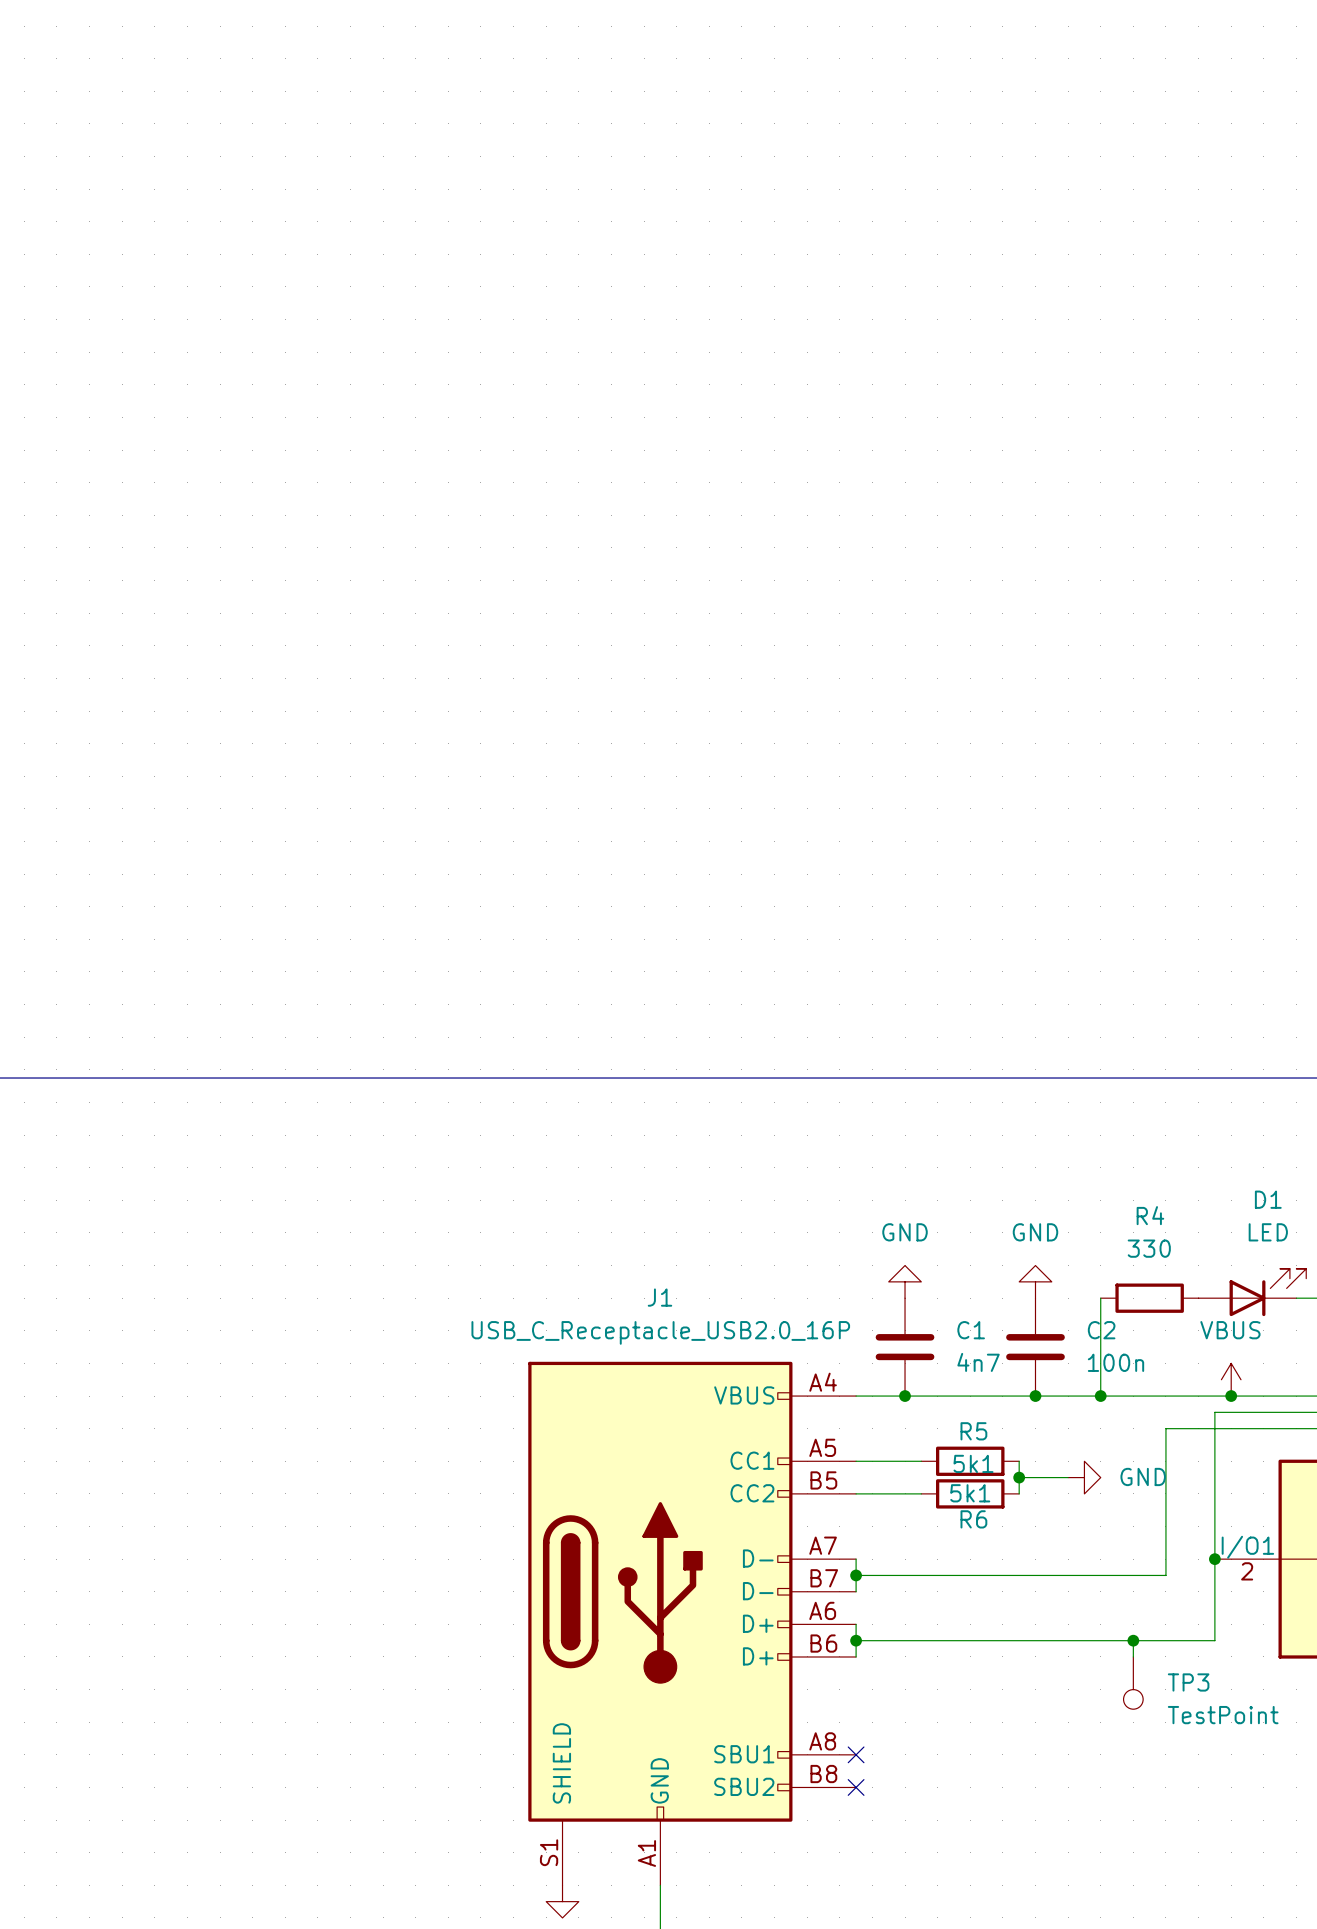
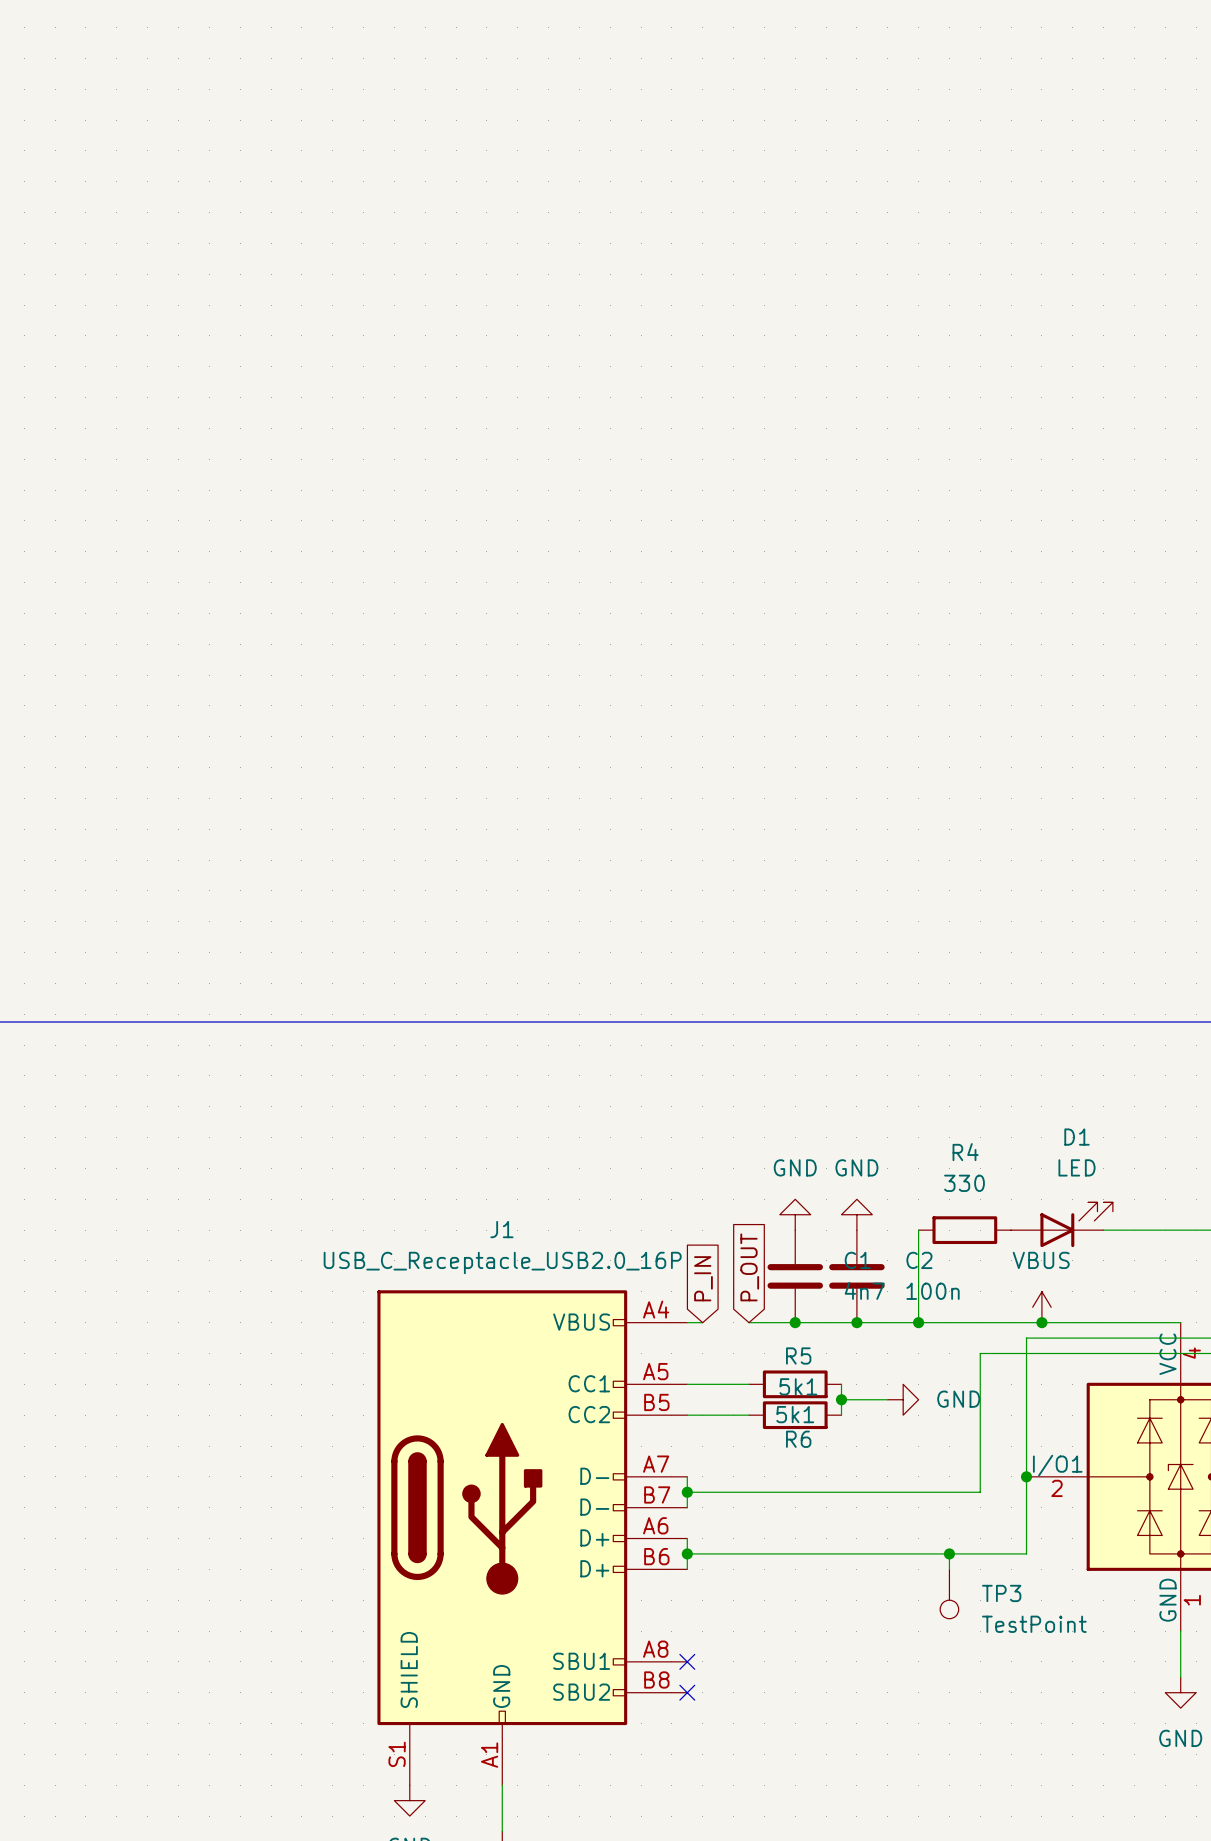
power symbol position: GND (905, 1281) -> GND (795, 1214)
global label: none -> P_OUT (749, 1267)
C1 position: (905, 1347) -> (795, 1276)
global label: none -> P_IN (703, 1278)
wire: (872, 1396) (921, 1396) -> none
junction position: (905, 1396) -> (795, 1322)

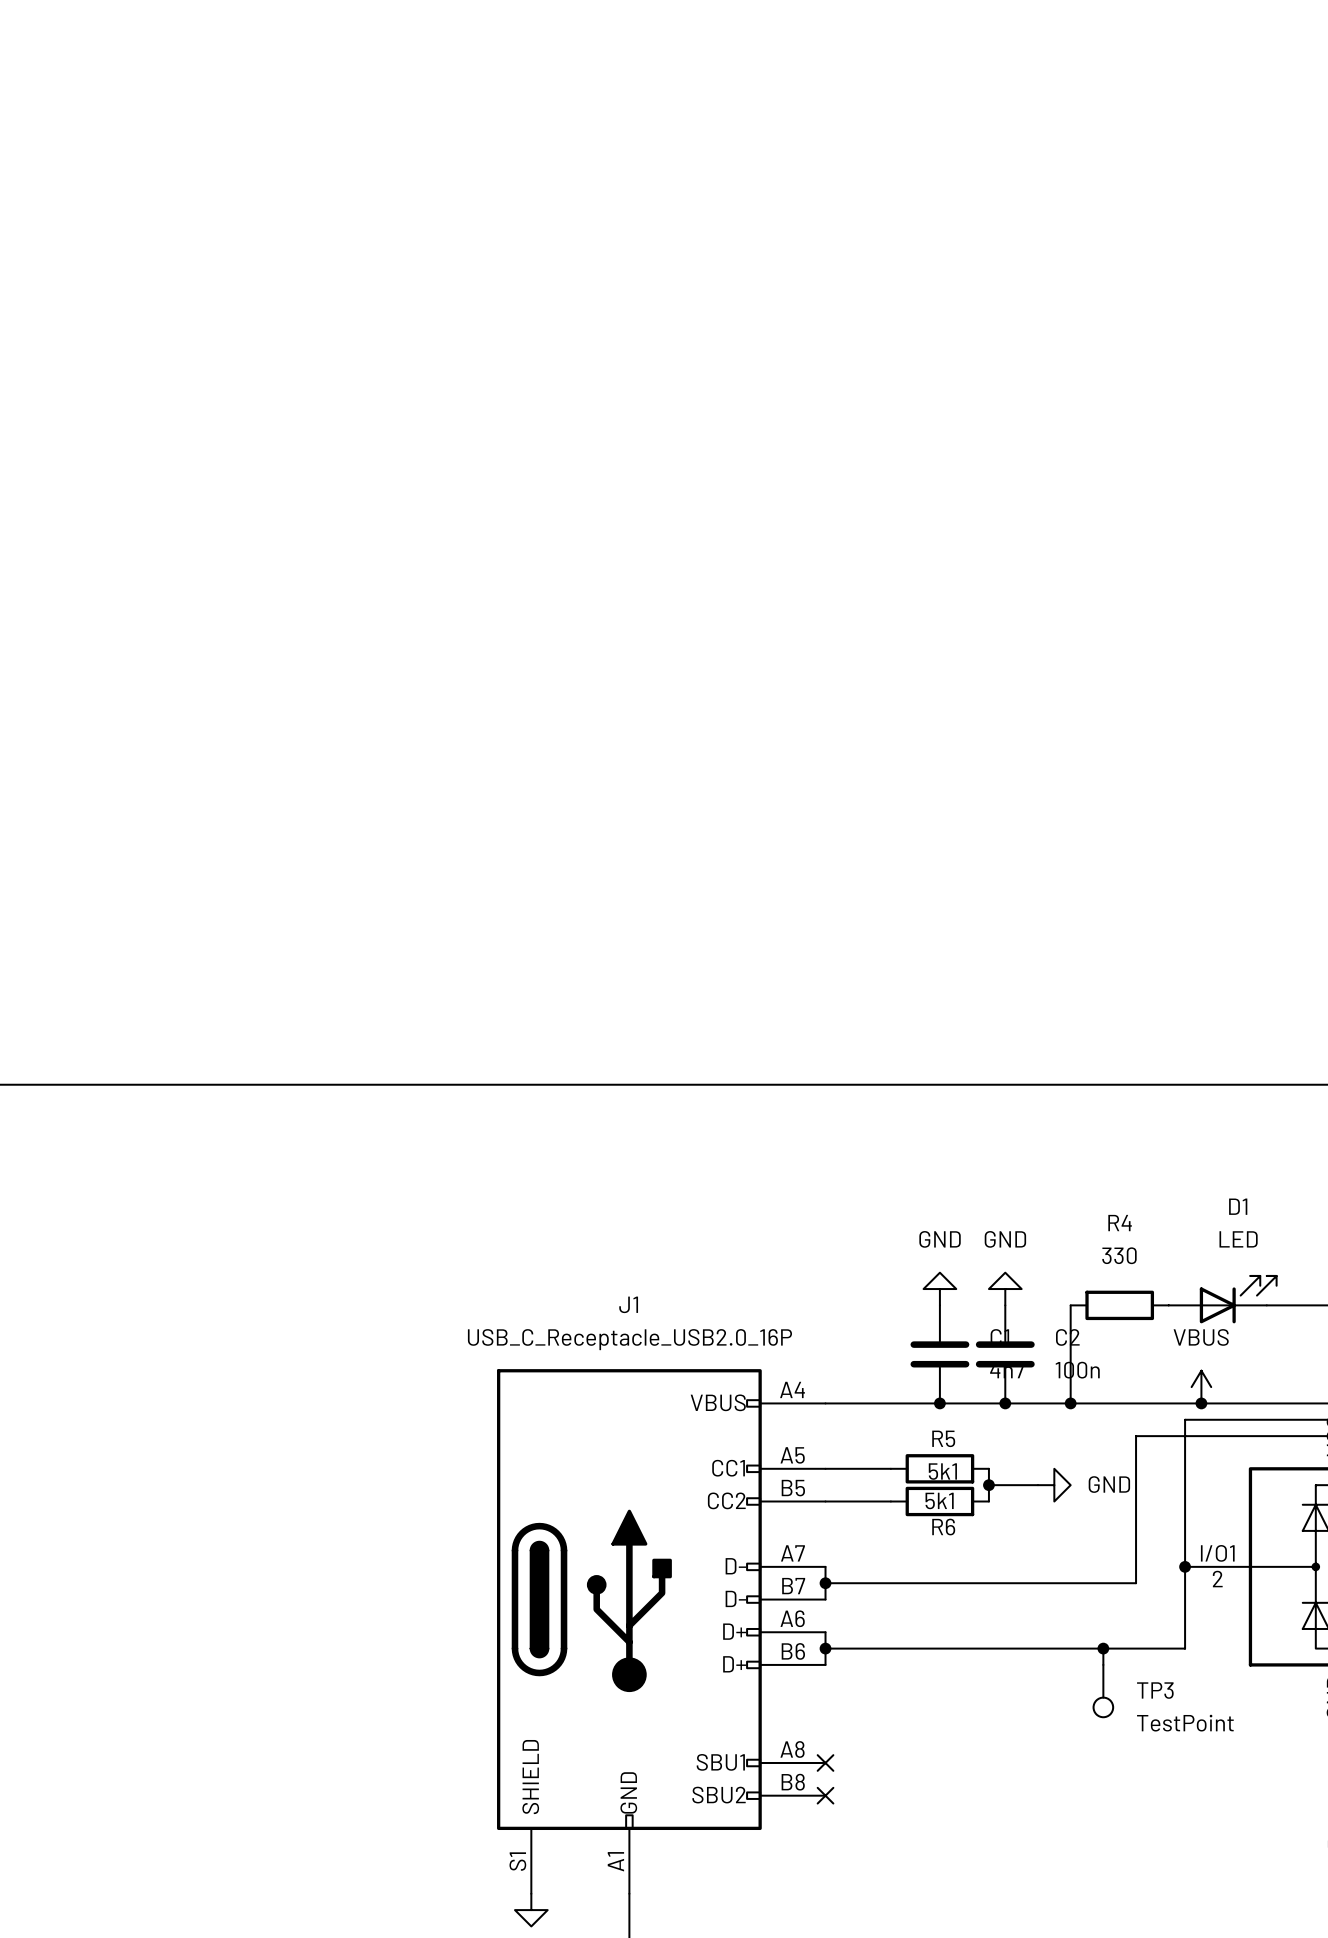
global label: P_OUT (749, 1267) -> none
global label: P_IN (703, 1278) -> none
wire: none -> (841, 1403) (890, 1403)

